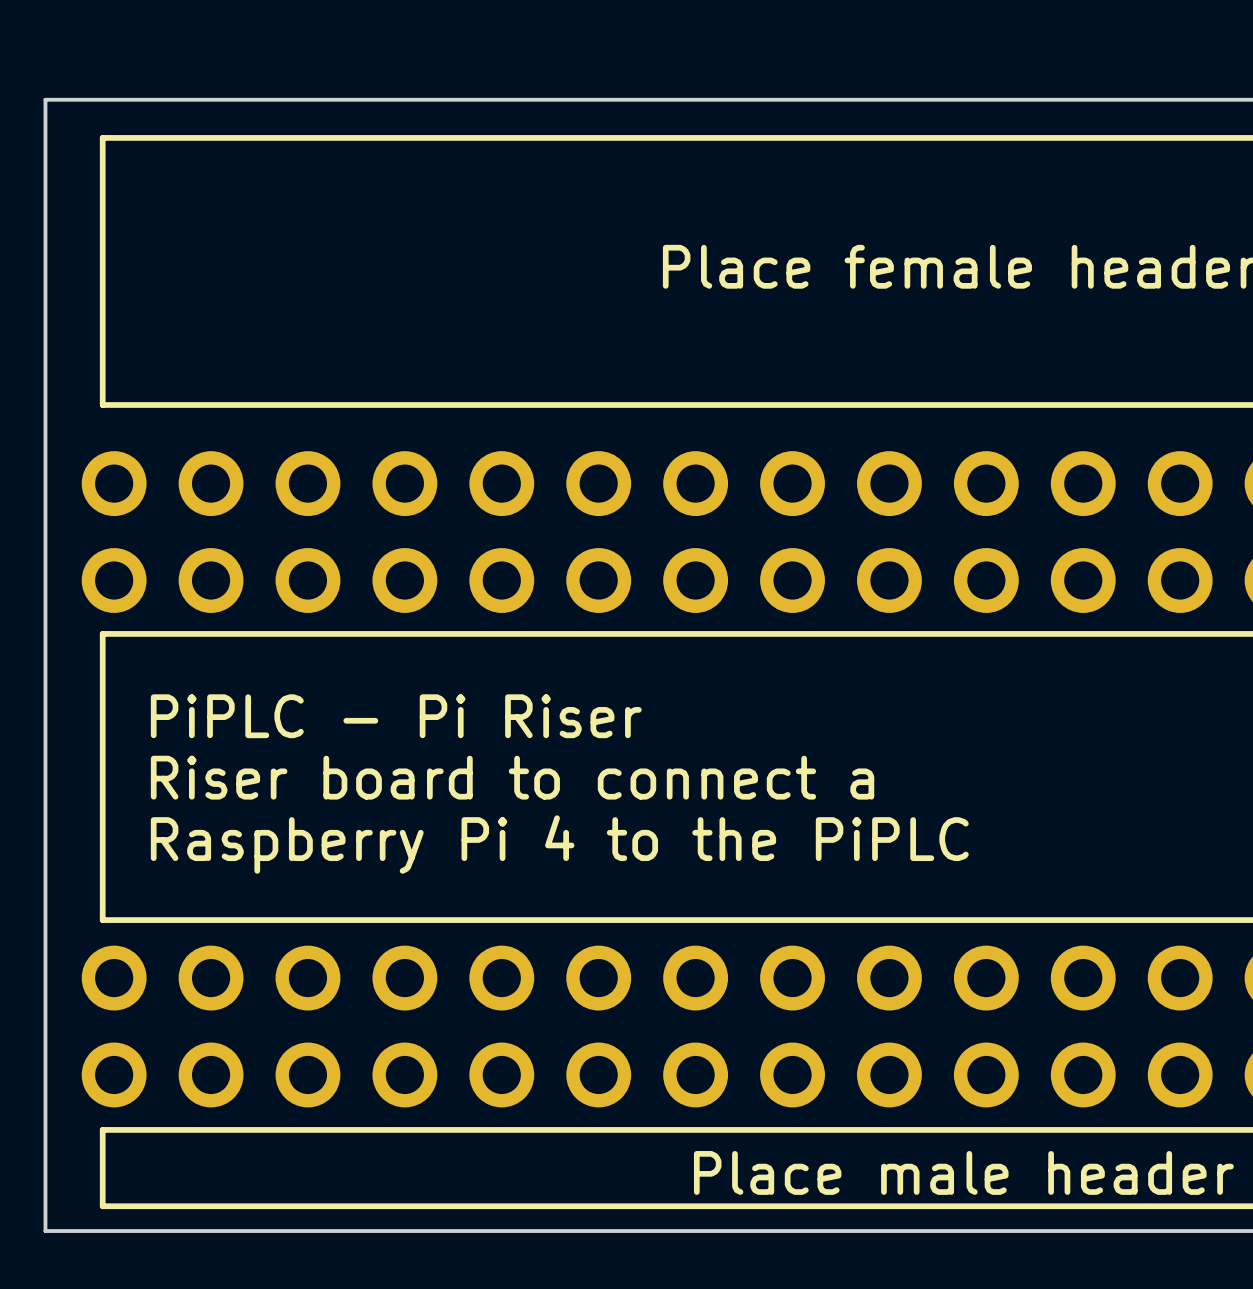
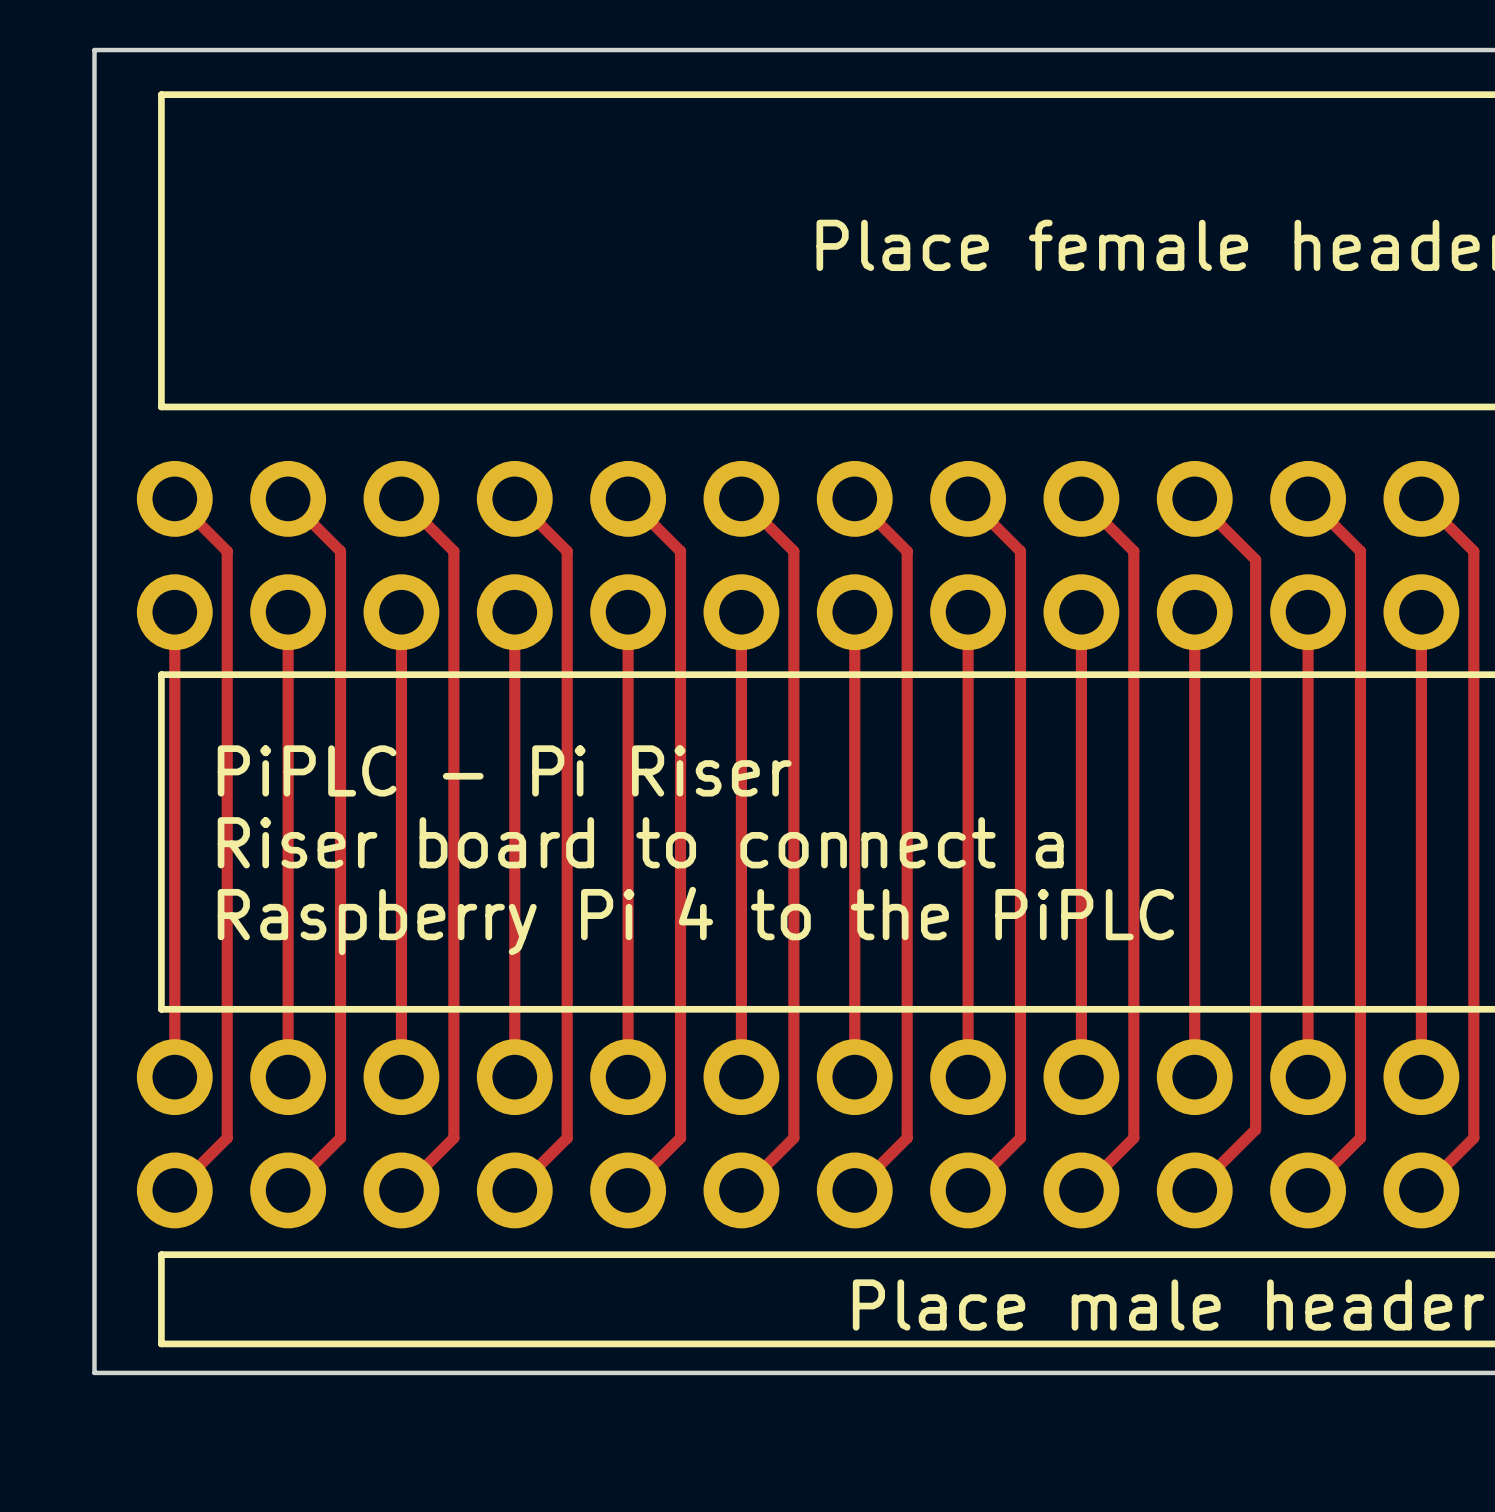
track: none -> (174, 498) (227, 551) (227, 1138) (174, 1190)
track: none -> (288, 498) (340, 551) (340, 1138) (288, 1190)
track: none -> (401, 498) (453, 551) (453, 1138) (401, 1190)
track: none -> (514, 498) (567, 551) (567, 1138) (514, 1190)
track: none -> (628, 498) (680, 551) (680, 1138) (628, 1190)
track: none -> (741, 498) (793, 551) (793, 1138) (741, 1190)
track: none -> (854, 498) (907, 551) (907, 1138) (854, 1190)
track: none -> (968, 498) (1020, 551) (1020, 1138) (968, 1190)
track: none -> (1081, 498) (1133, 551) (1133, 1138) (1081, 1190)
track: none -> (1194, 498) (1255, 559) (1255, 1129) (1194, 1190)
track: none -> (1308, 498) (1360, 551) (1360, 1138) (1308, 1190)
track: none -> (1421, 498) (1473, 551) (1473, 1138) (1421, 1190)
track: none -> (174, 612) (174, 1077)
track: none -> (288, 612) (288, 1077)
track: none -> (401, 612) (401, 1077)
track: none -> (514, 612) (514, 1077)
track: none -> (628, 612) (628, 1077)
track: none -> (741, 612) (741, 1077)
track: none -> (854, 612) (854, 1077)
track: none -> (968, 612) (968, 1077)
track: none -> (1081, 612) (1081, 1077)
track: none -> (1194, 612) (1194, 1077)
track: none -> (1308, 612) (1308, 1077)
track: none -> (1421, 612) (1421, 1077)

